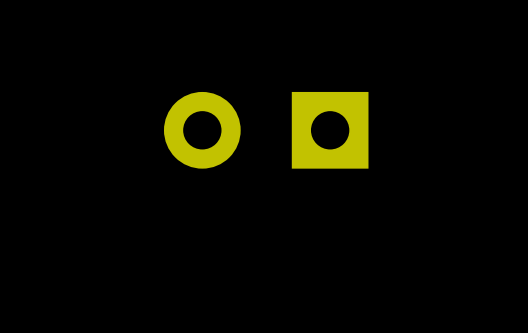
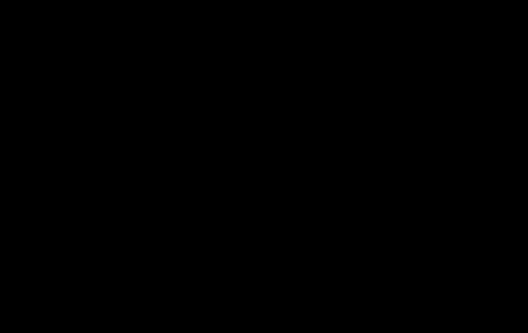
part: (266, 130) -> none

